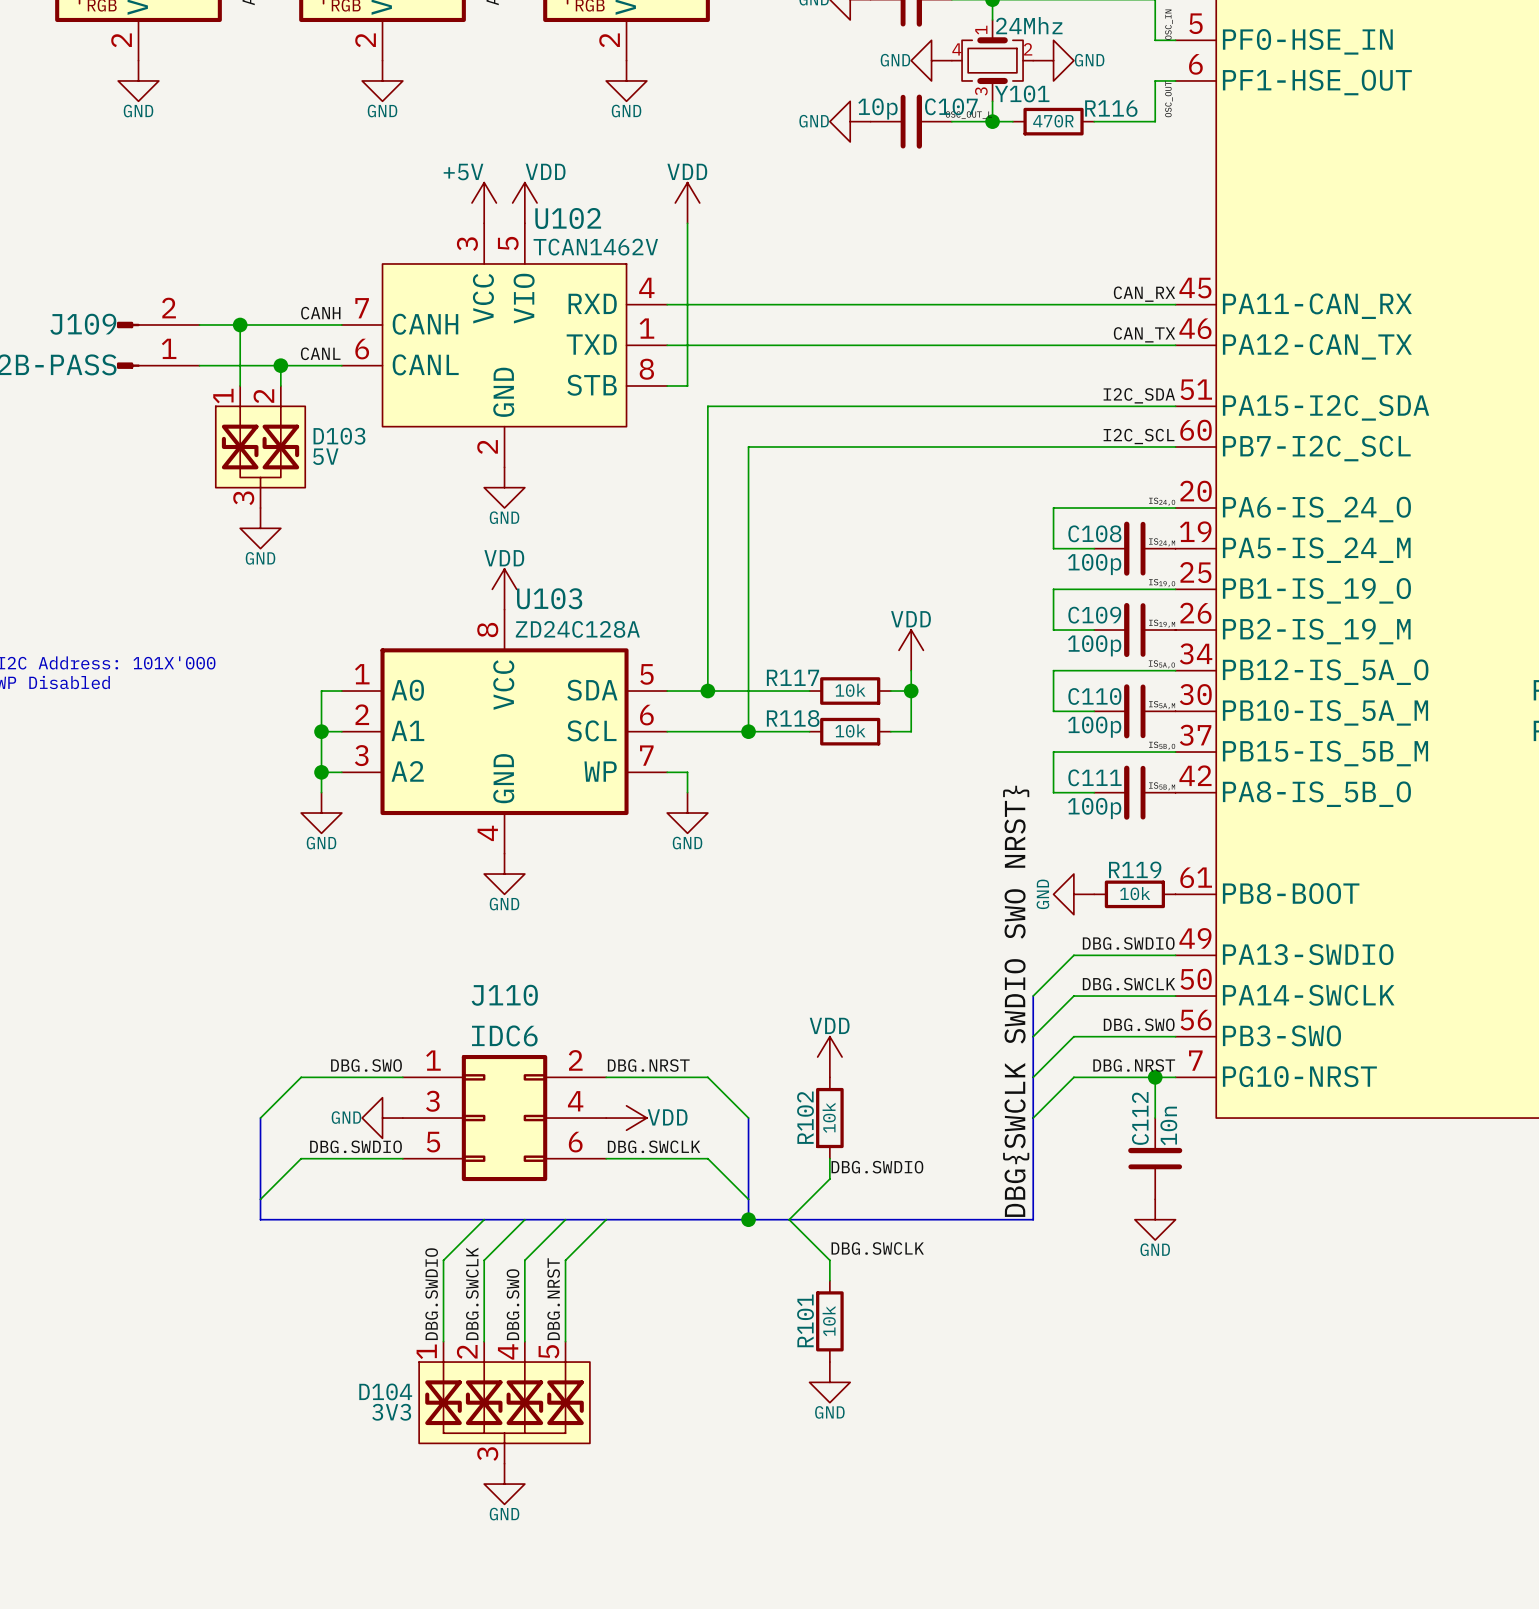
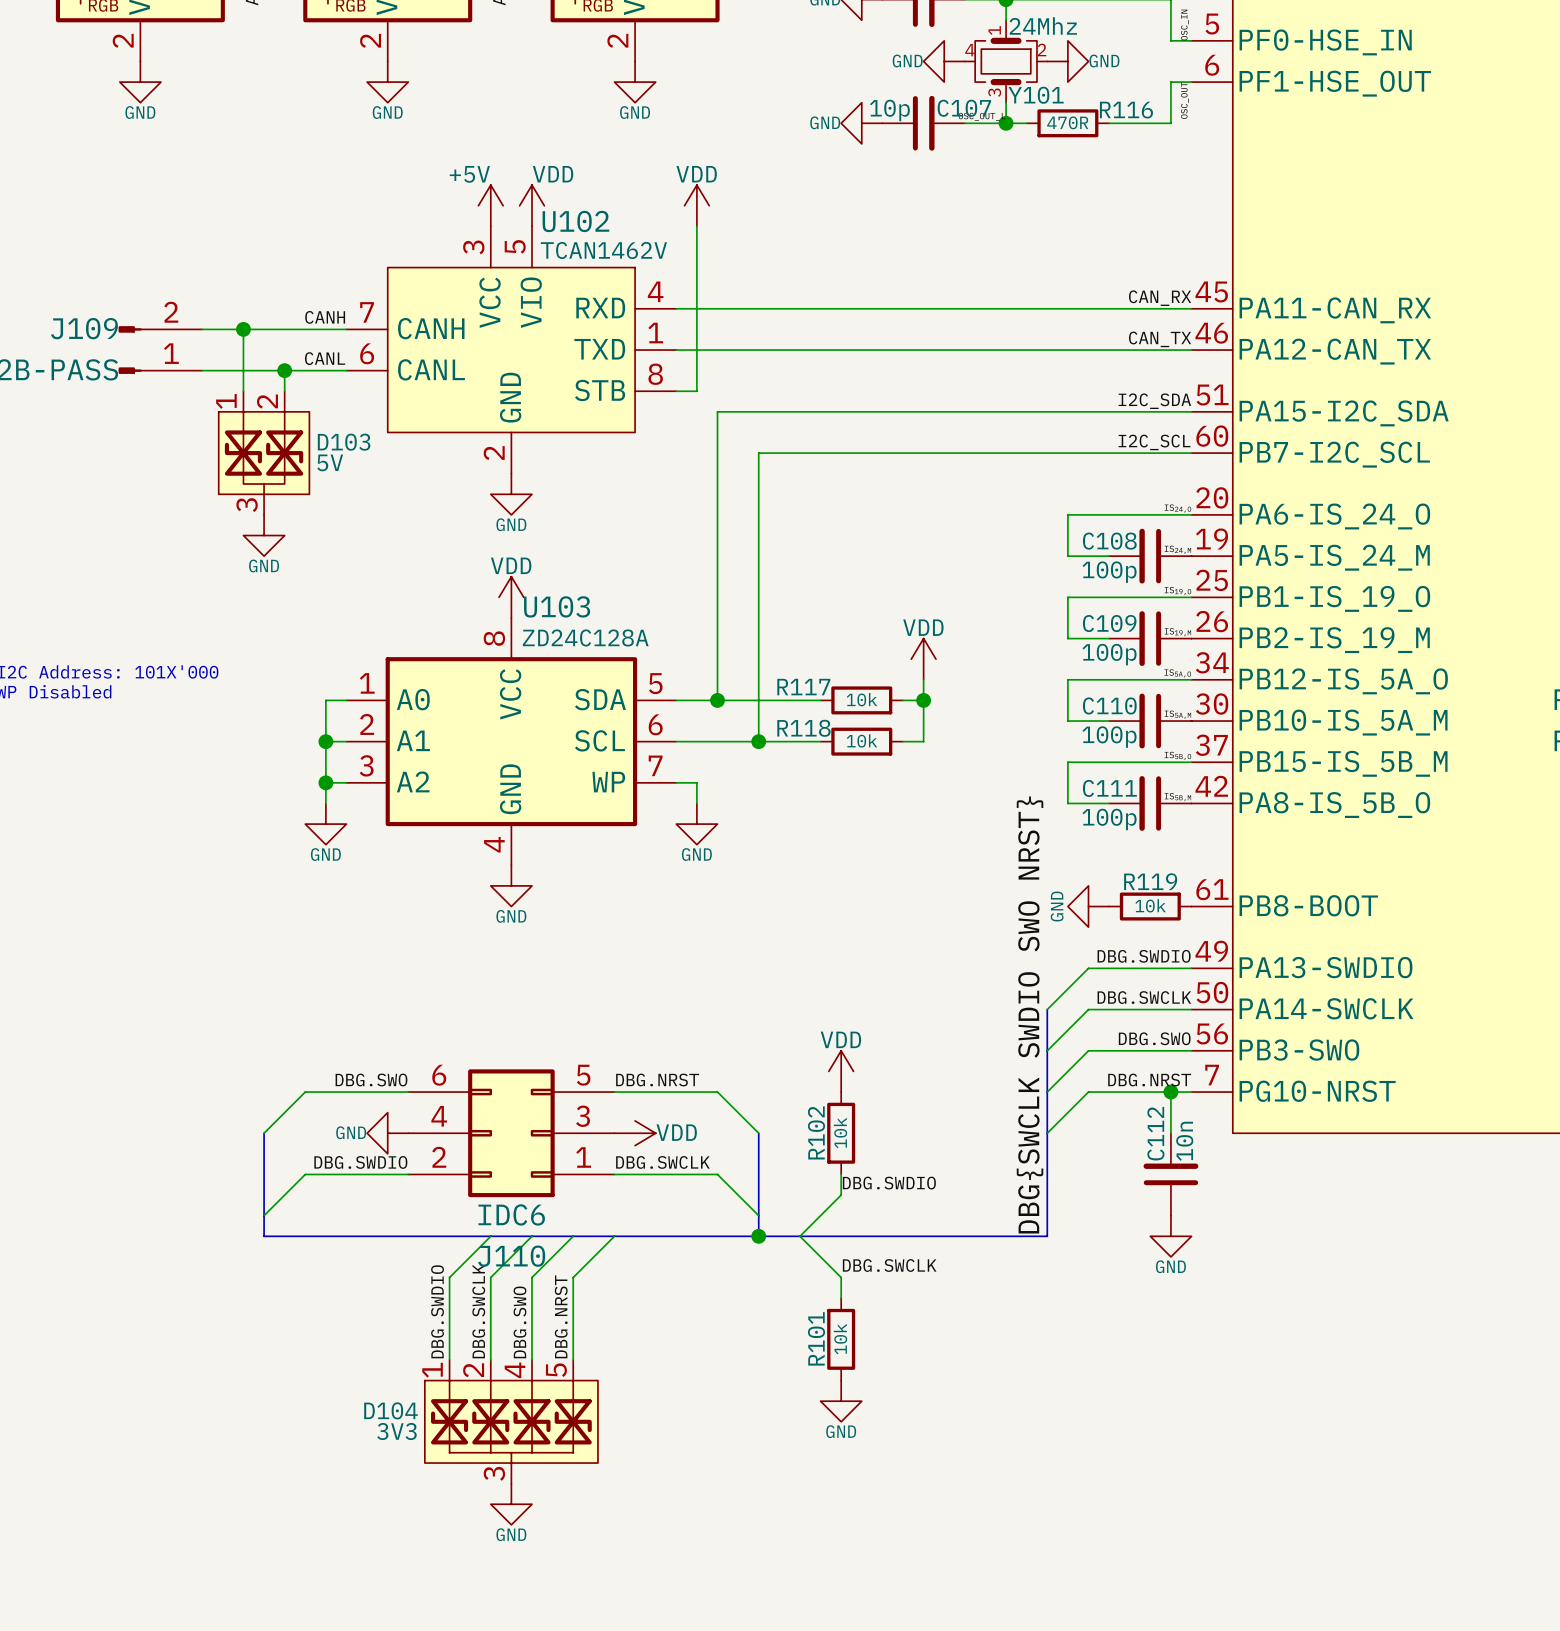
J110 rotation: 0° (504, 1118) -> 180° (511, 1133)

